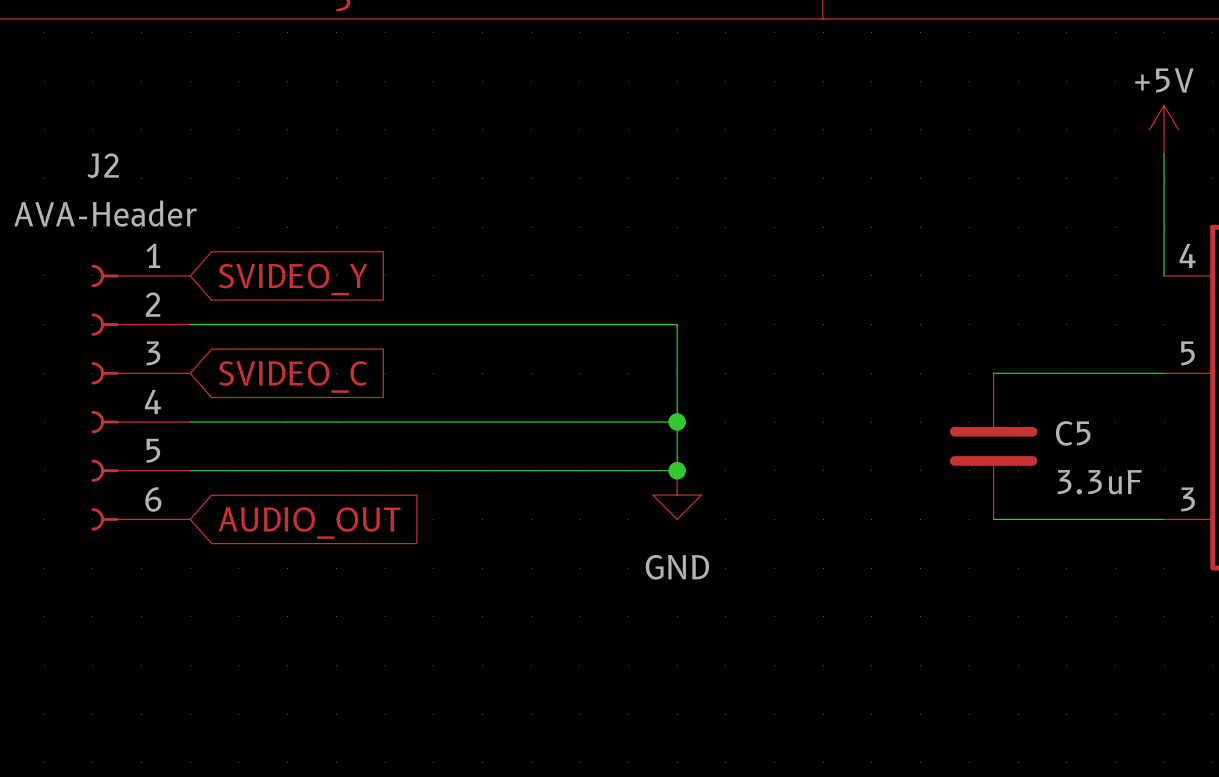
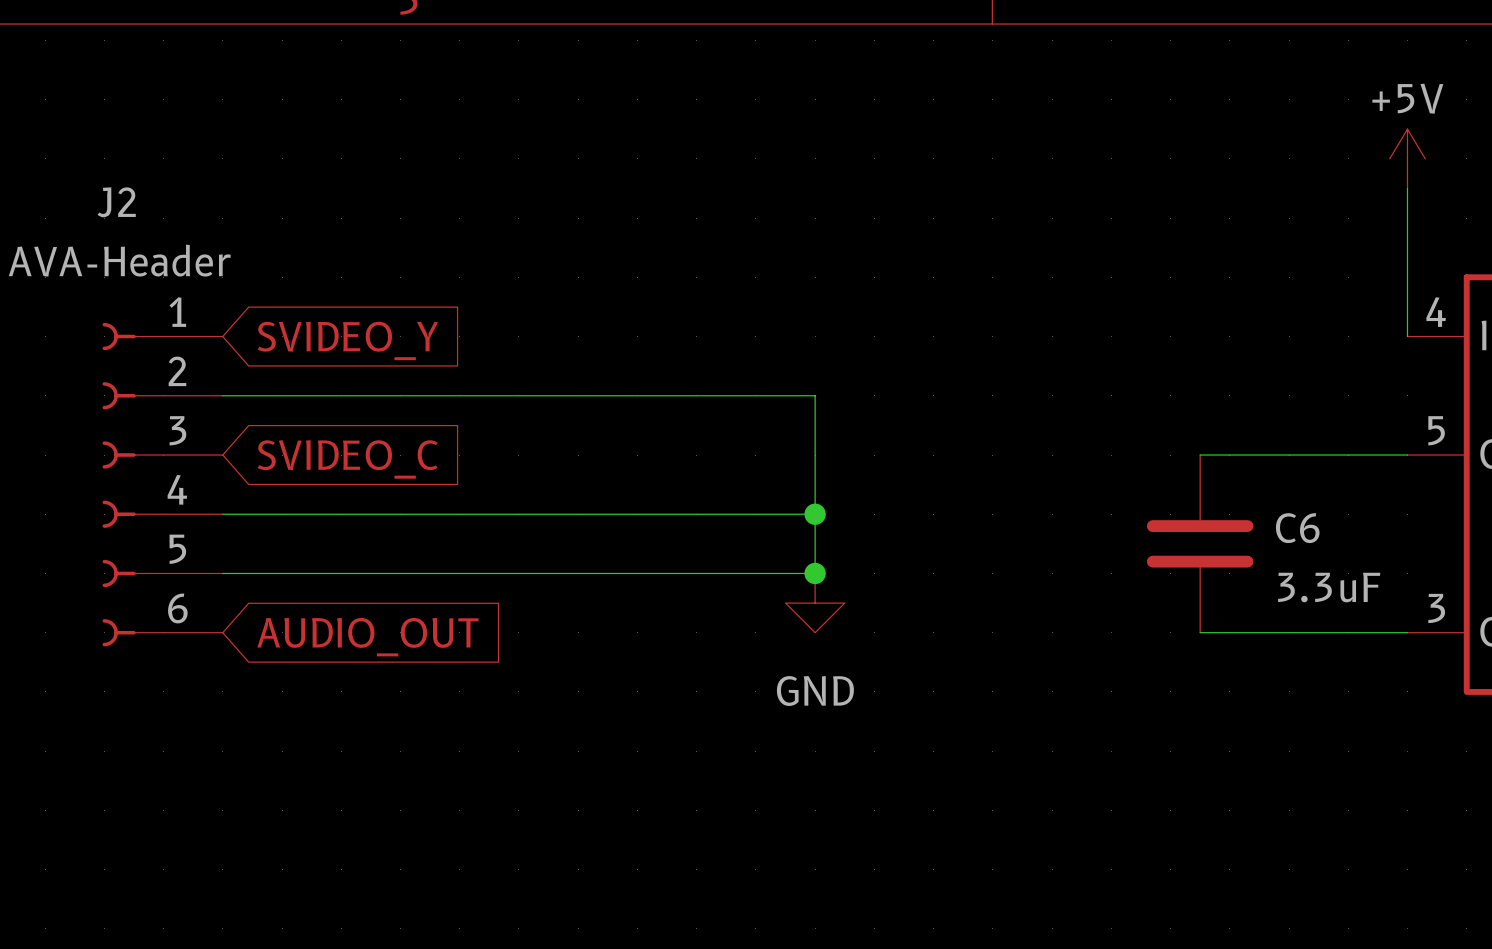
C5 name: C5 (1073, 433) -> C6 (1297, 528)

